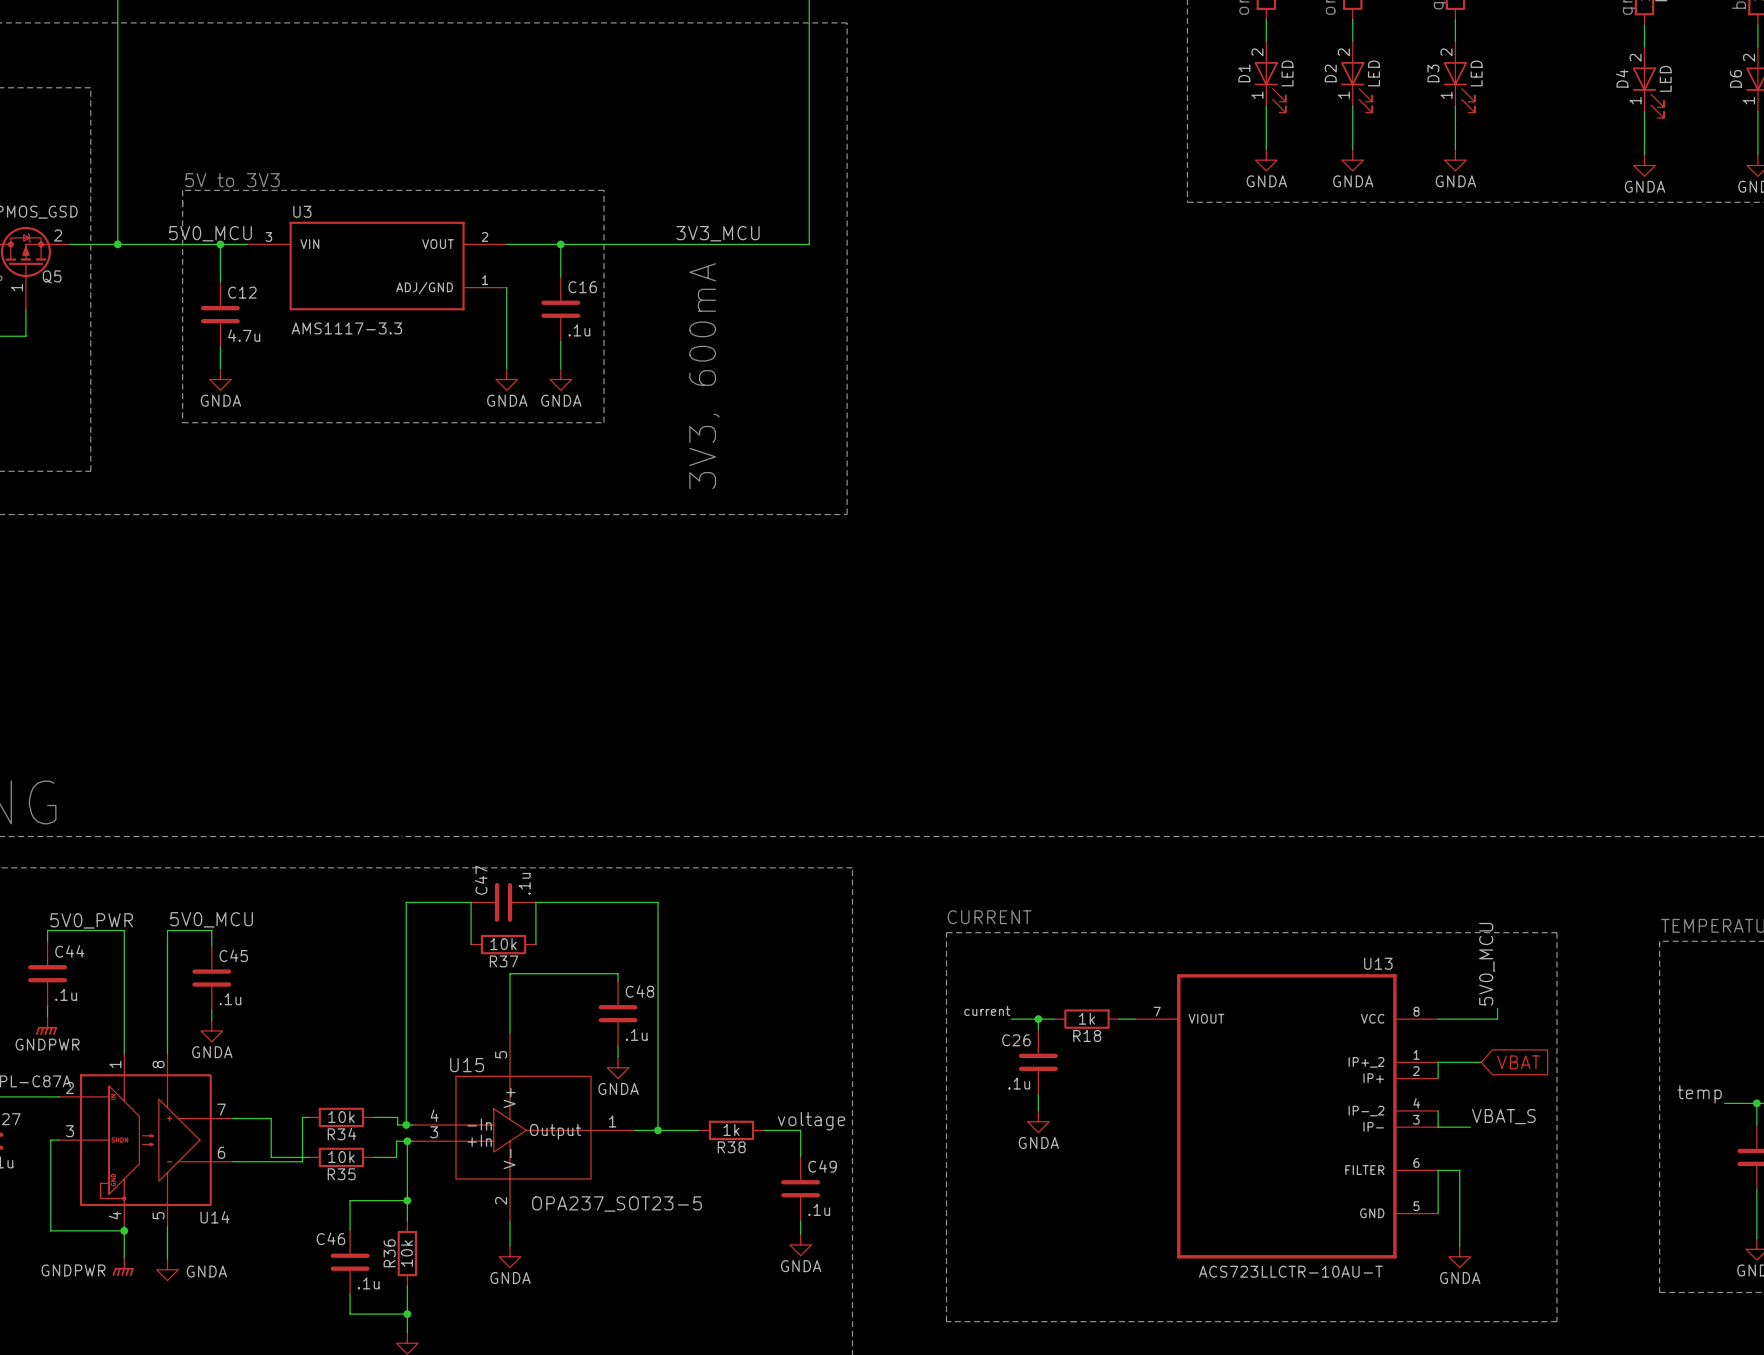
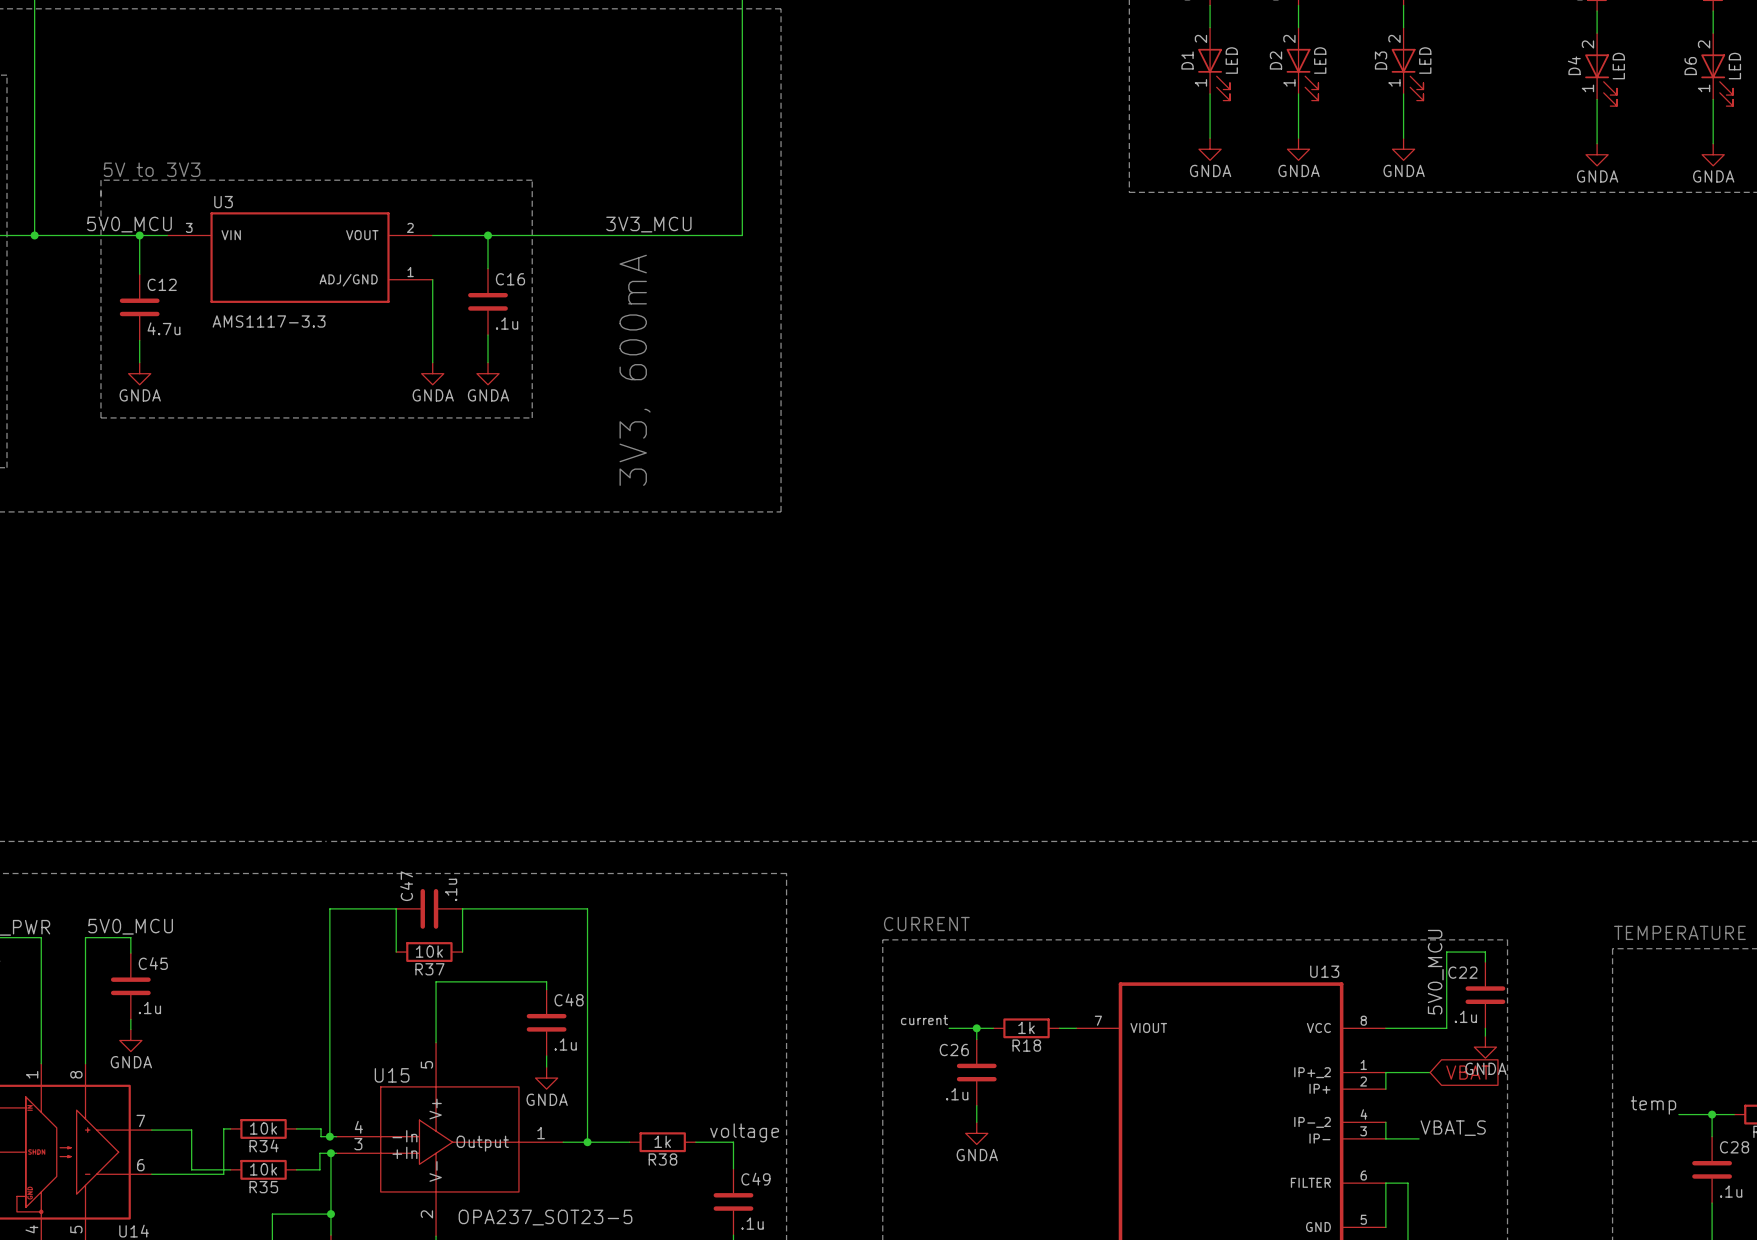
wire: none -> (1485, 961) (1485, 952) (1446, 952) (1446, 1017)
C22: none -> .1u (1485, 995)
wire: none -> (1485, 1028) (1485, 1036)
power symbol: none -> GNDA (1485, 1047)

